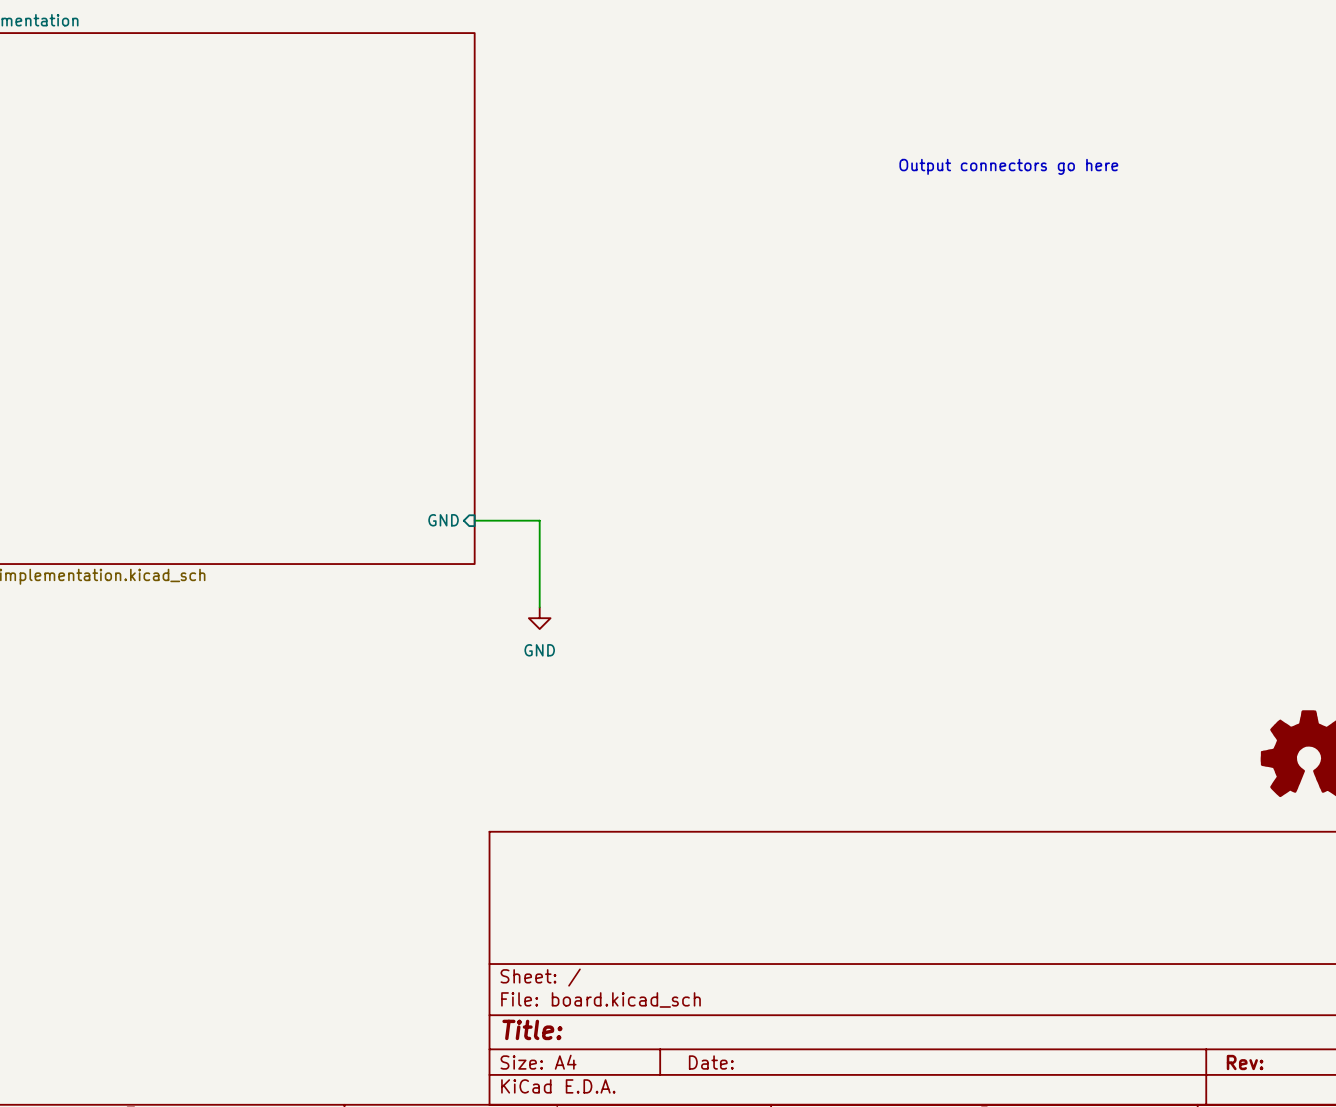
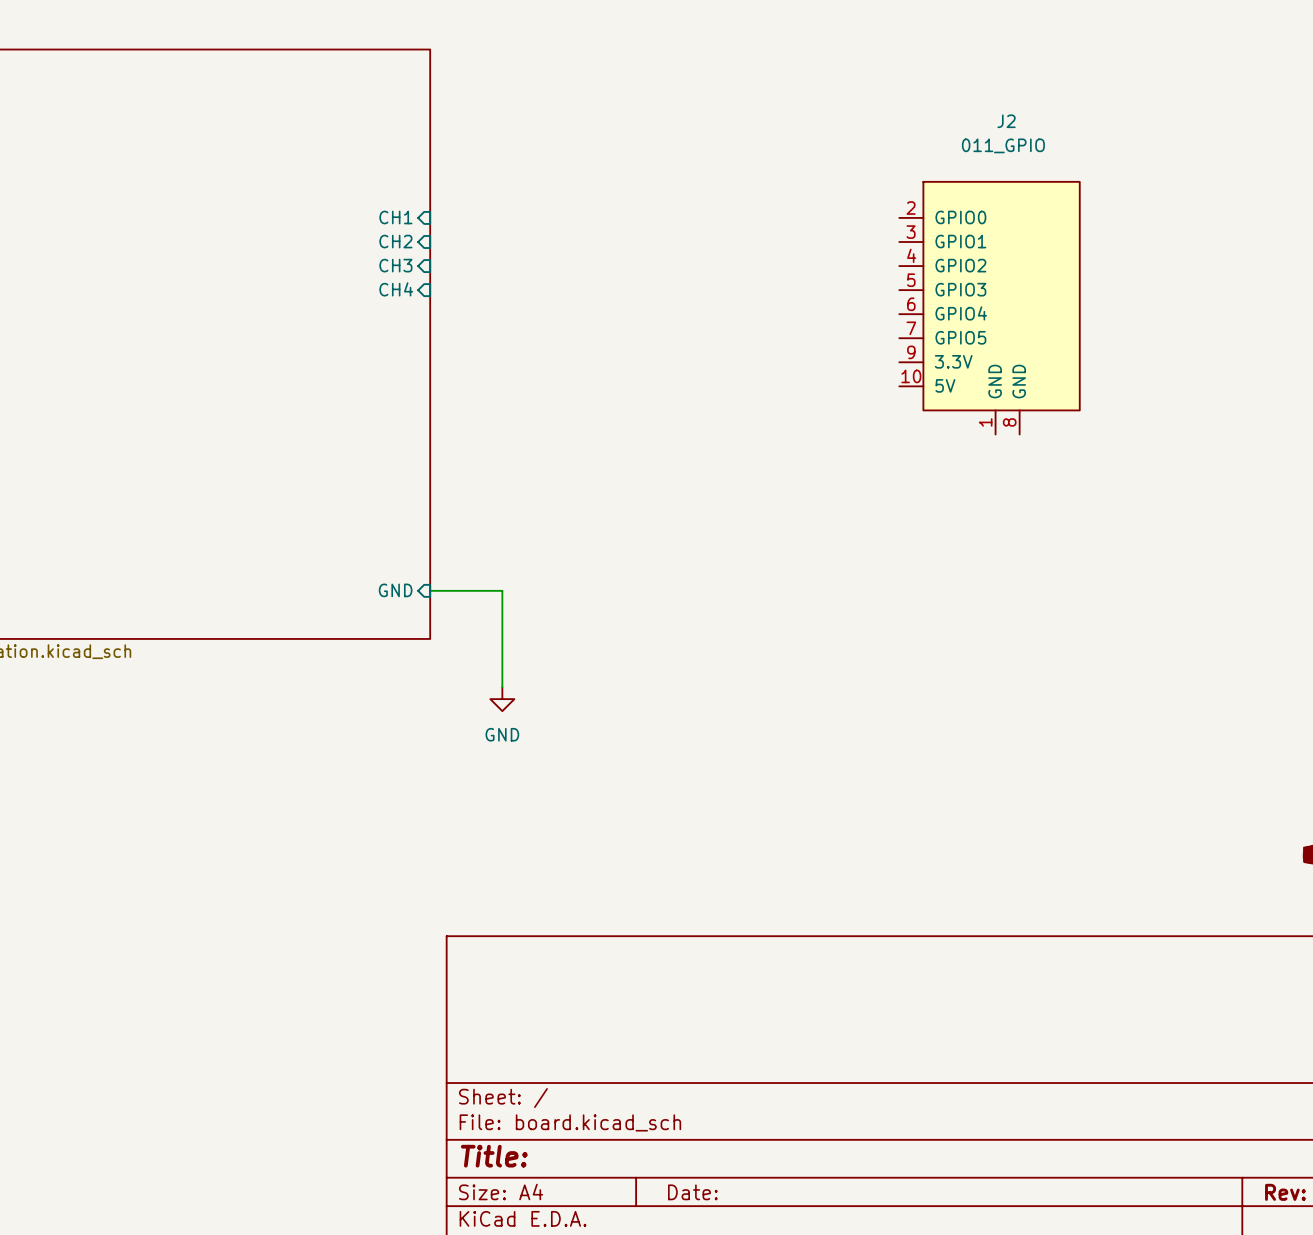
text: Output connectors go here (1008, 166) -> none
sheet pin: none -> CH1 (395, 217)
sheet pin: none -> CH2 (395, 241)
sheet pin: none -> CH3 (395, 265)
sheet pin: none -> CH4 (396, 289)
J2: none -> 011_GPIO (989, 308)

